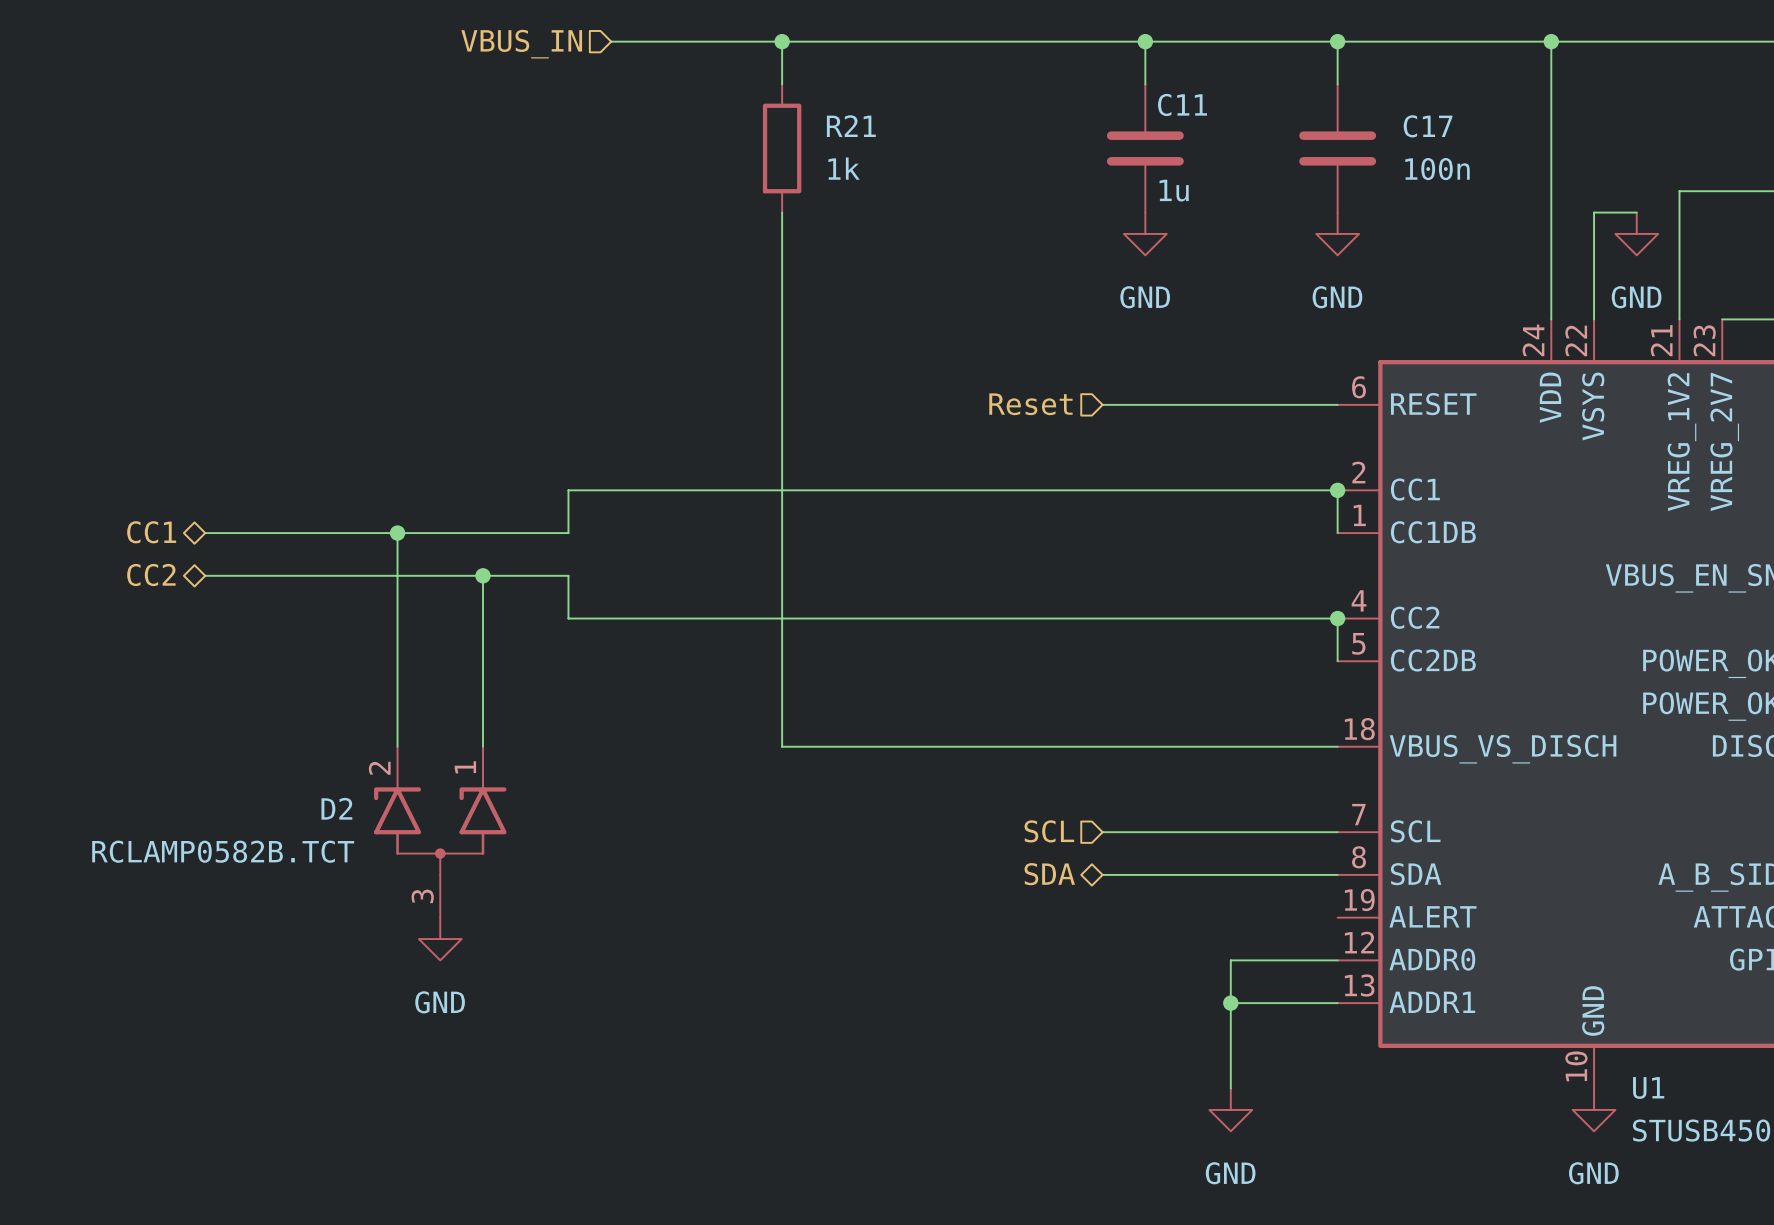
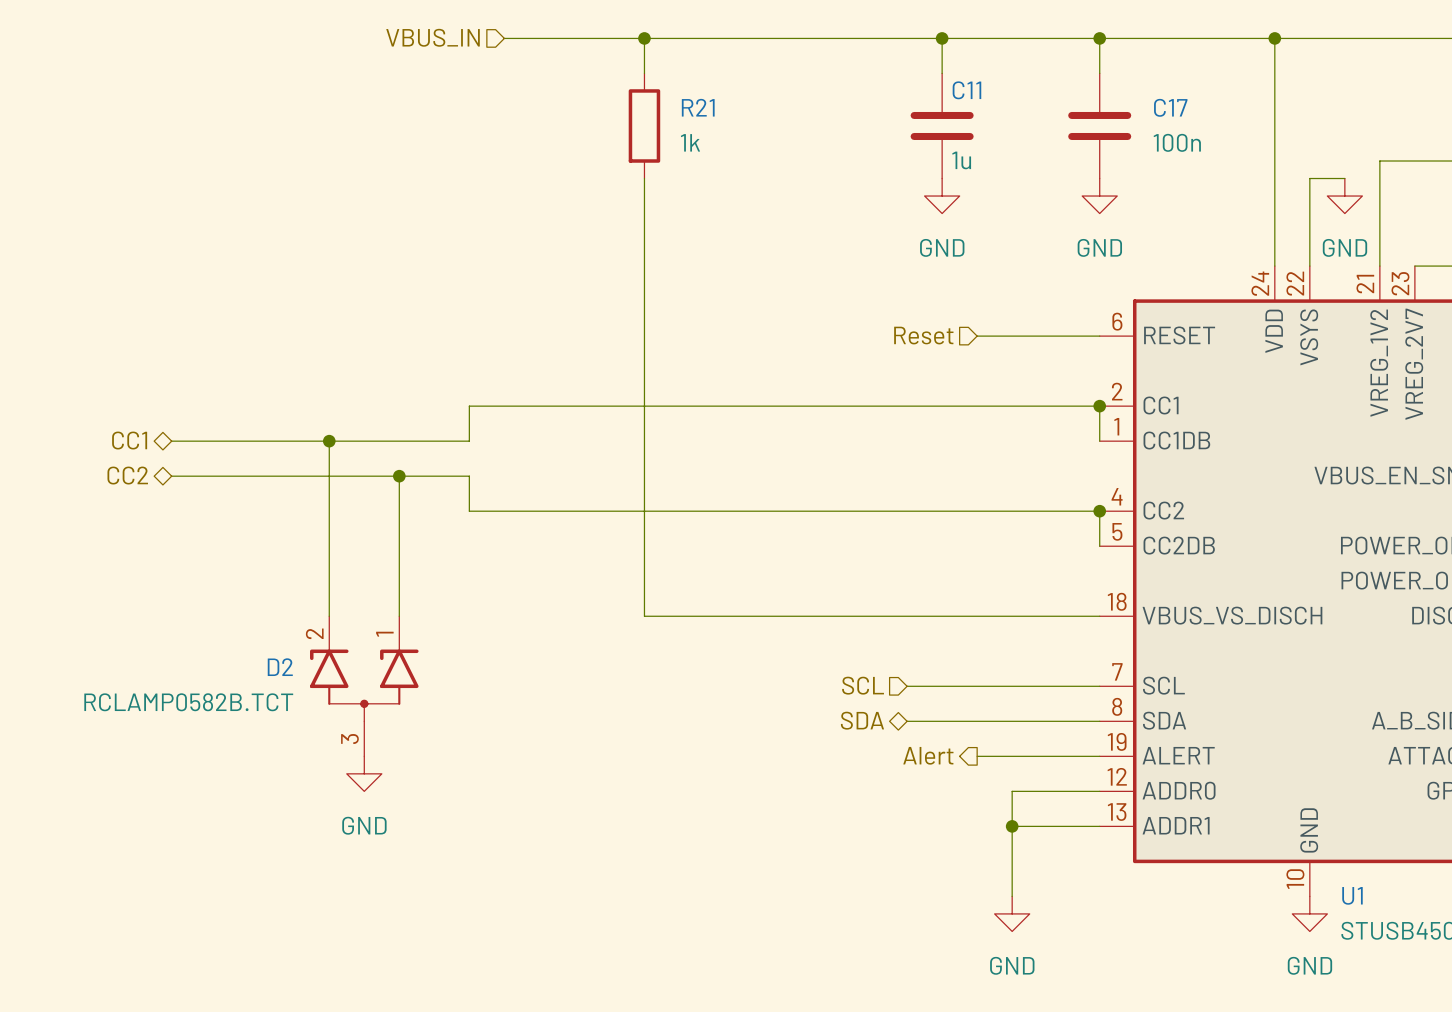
hierarchical label position: Reset (1030, 404) -> Reset (923, 335)
wire: (1102, 404) (1188, 404) -> none
hierarchical label: none -> Alert (928, 755)
wire: none -> (977, 756) (1099, 756)

